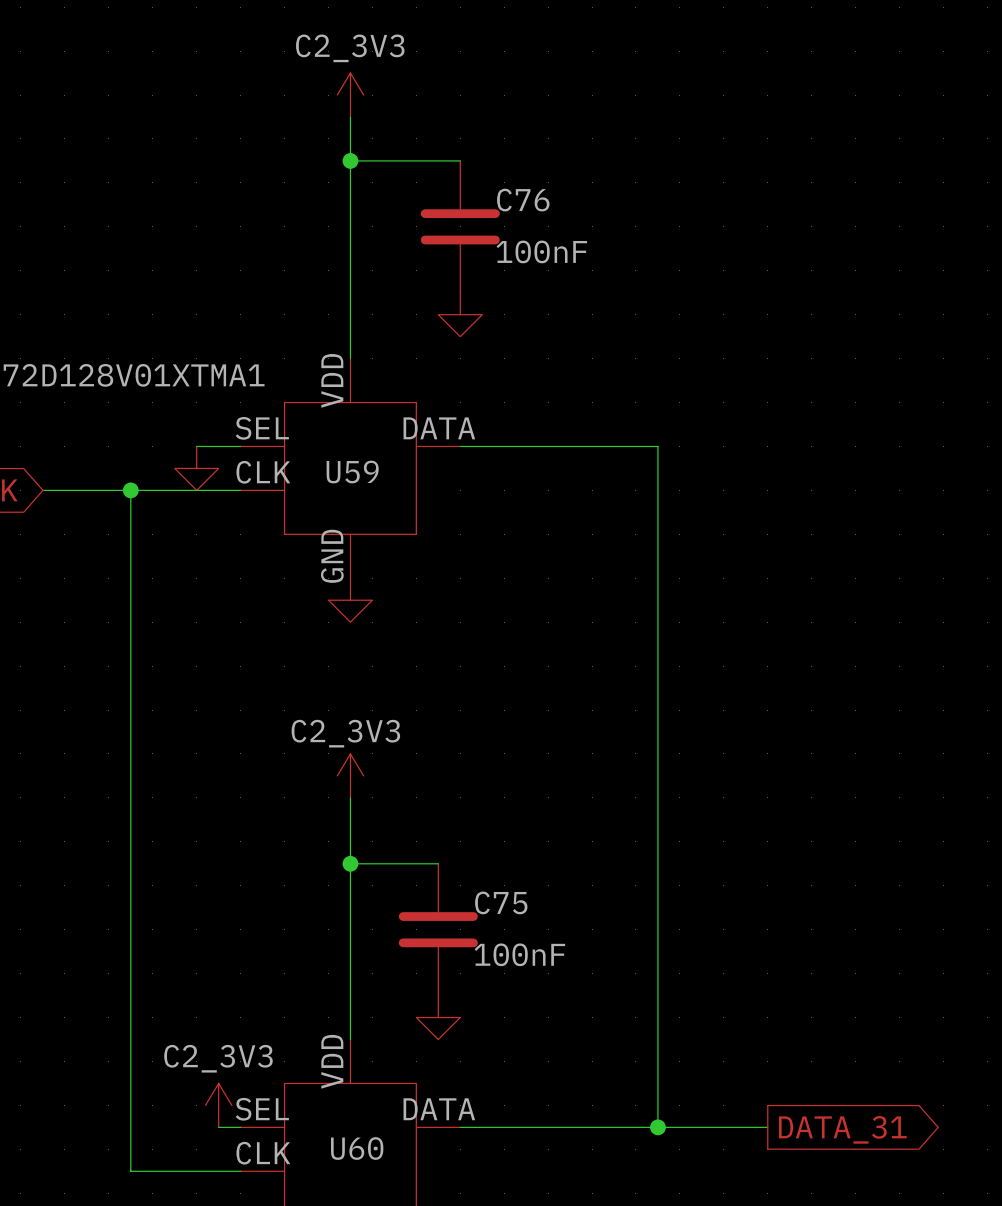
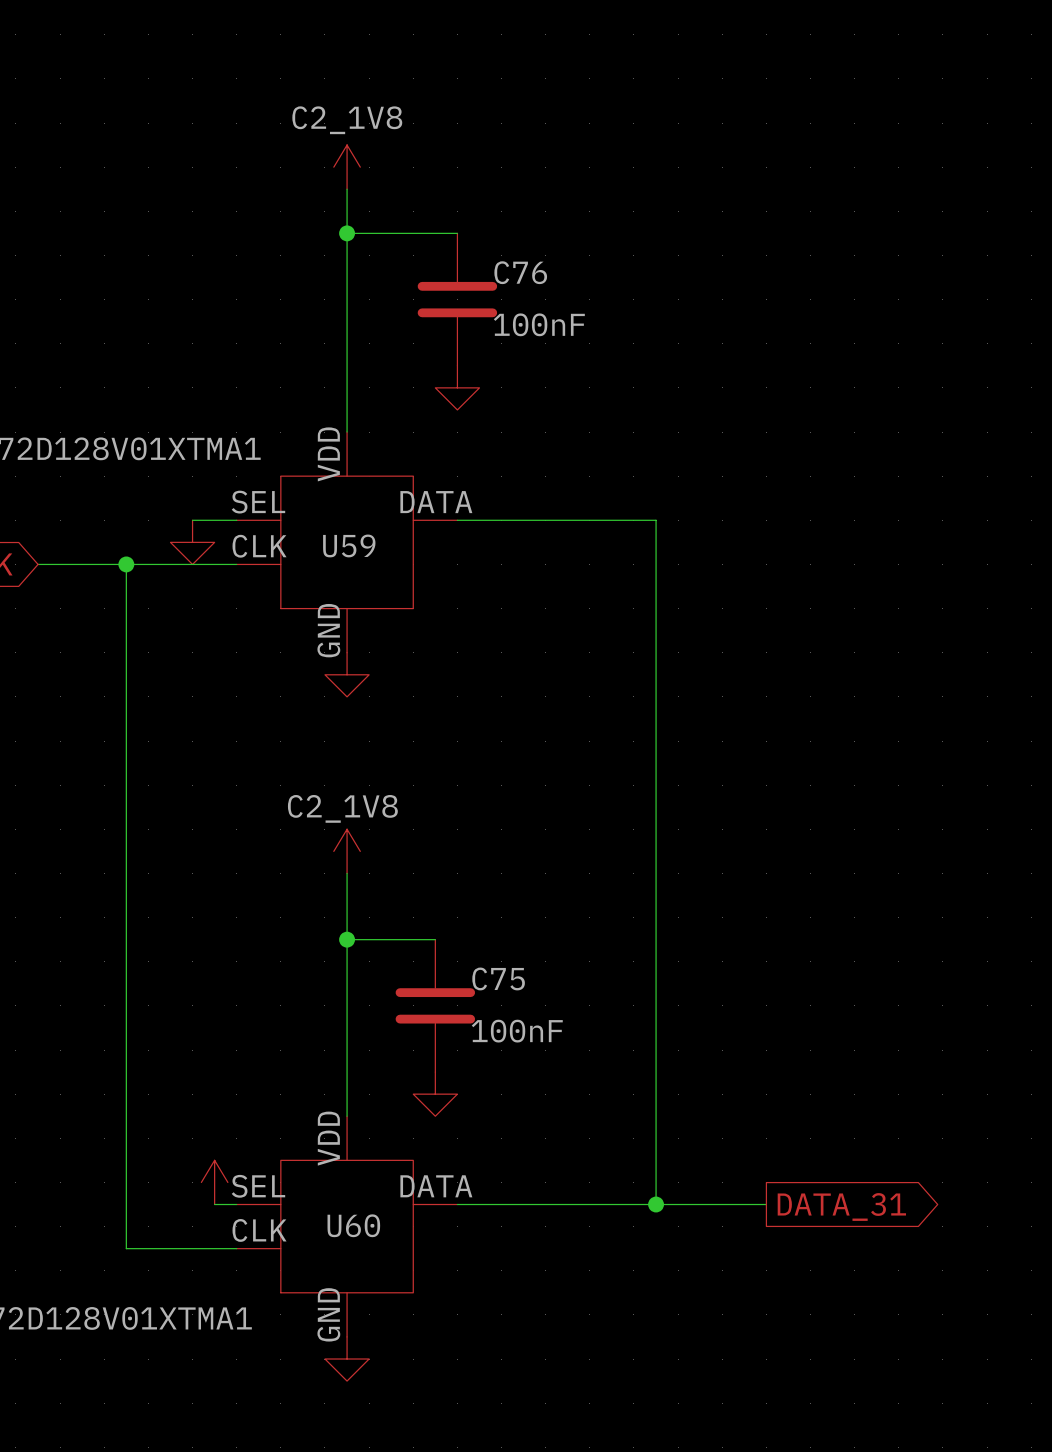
power symbol: C2_3V3 (350, 95) -> C2_1V8 (347, 167)
power symbol: C2_3V3 (350, 775) -> C2_1V8 (347, 851)
power symbol text: C2_3V3 (218, 1058) -> none

